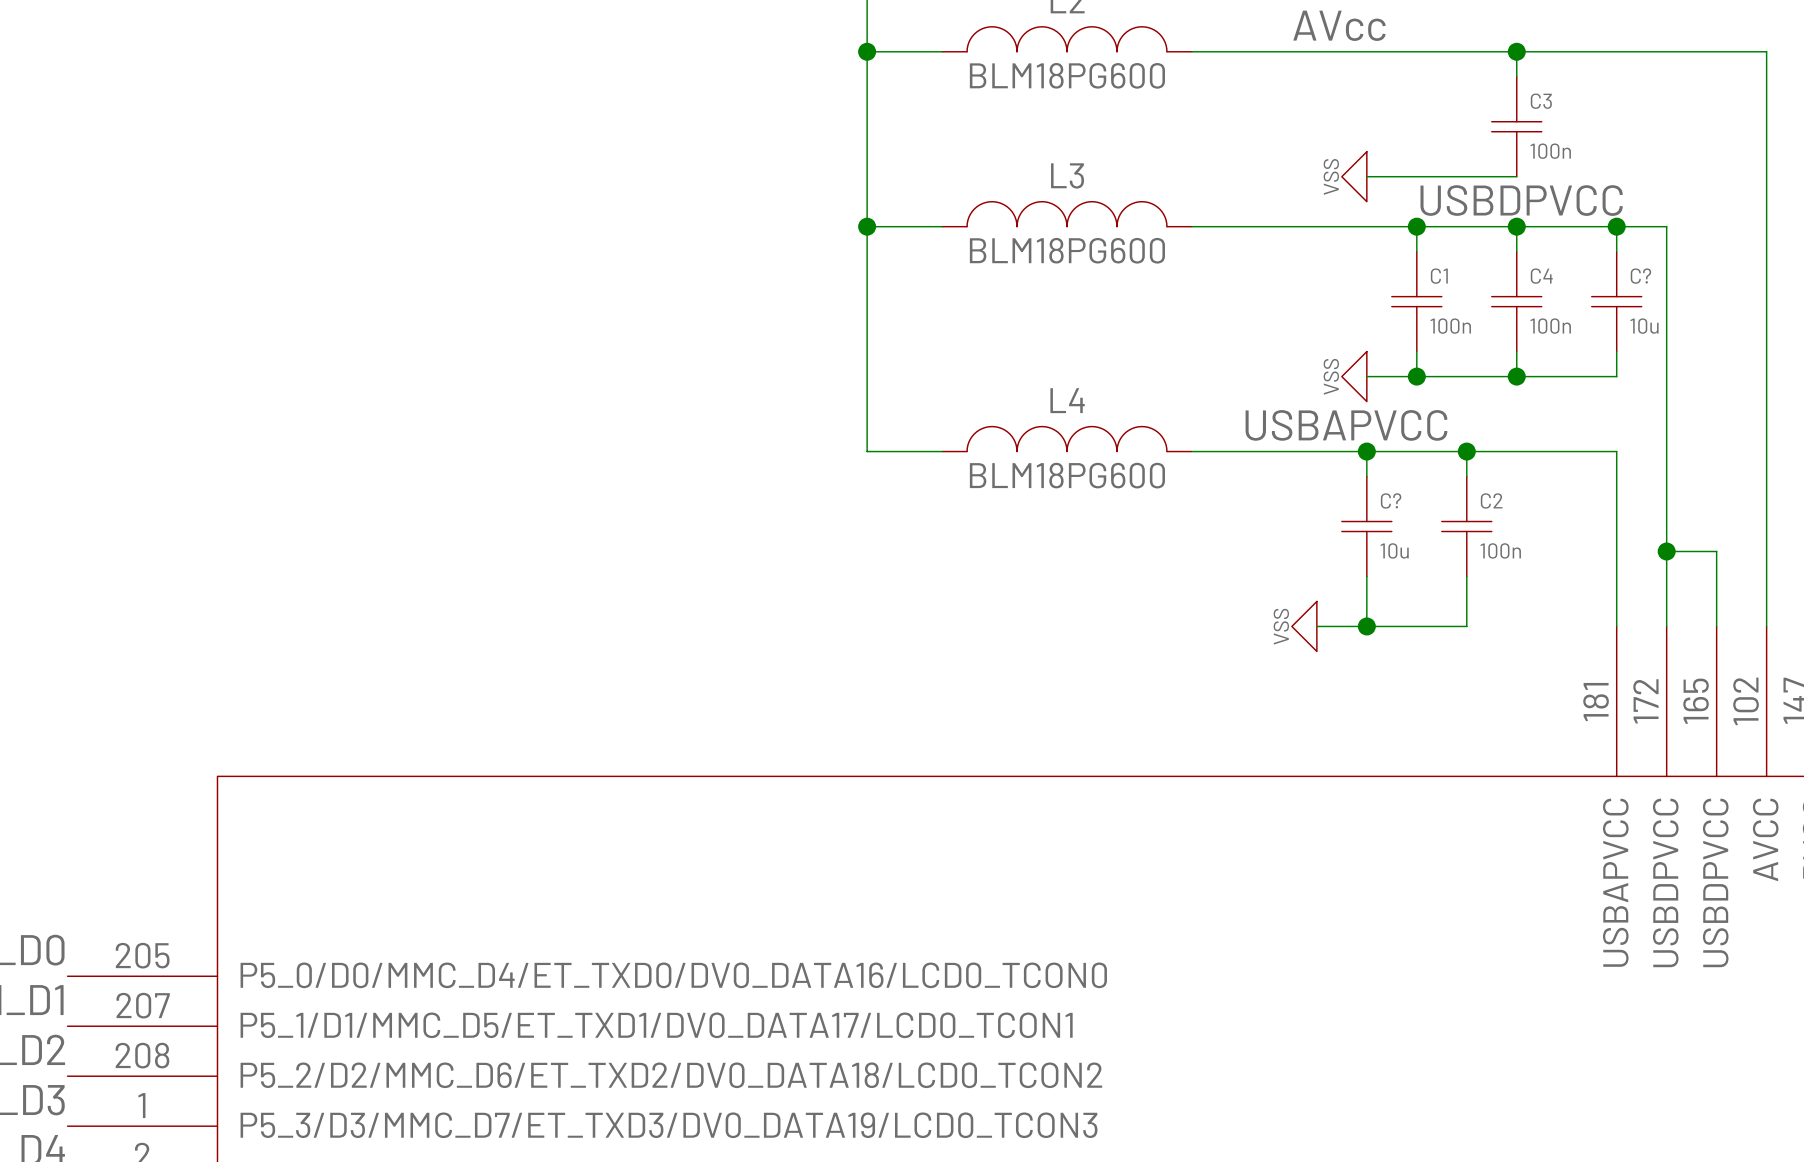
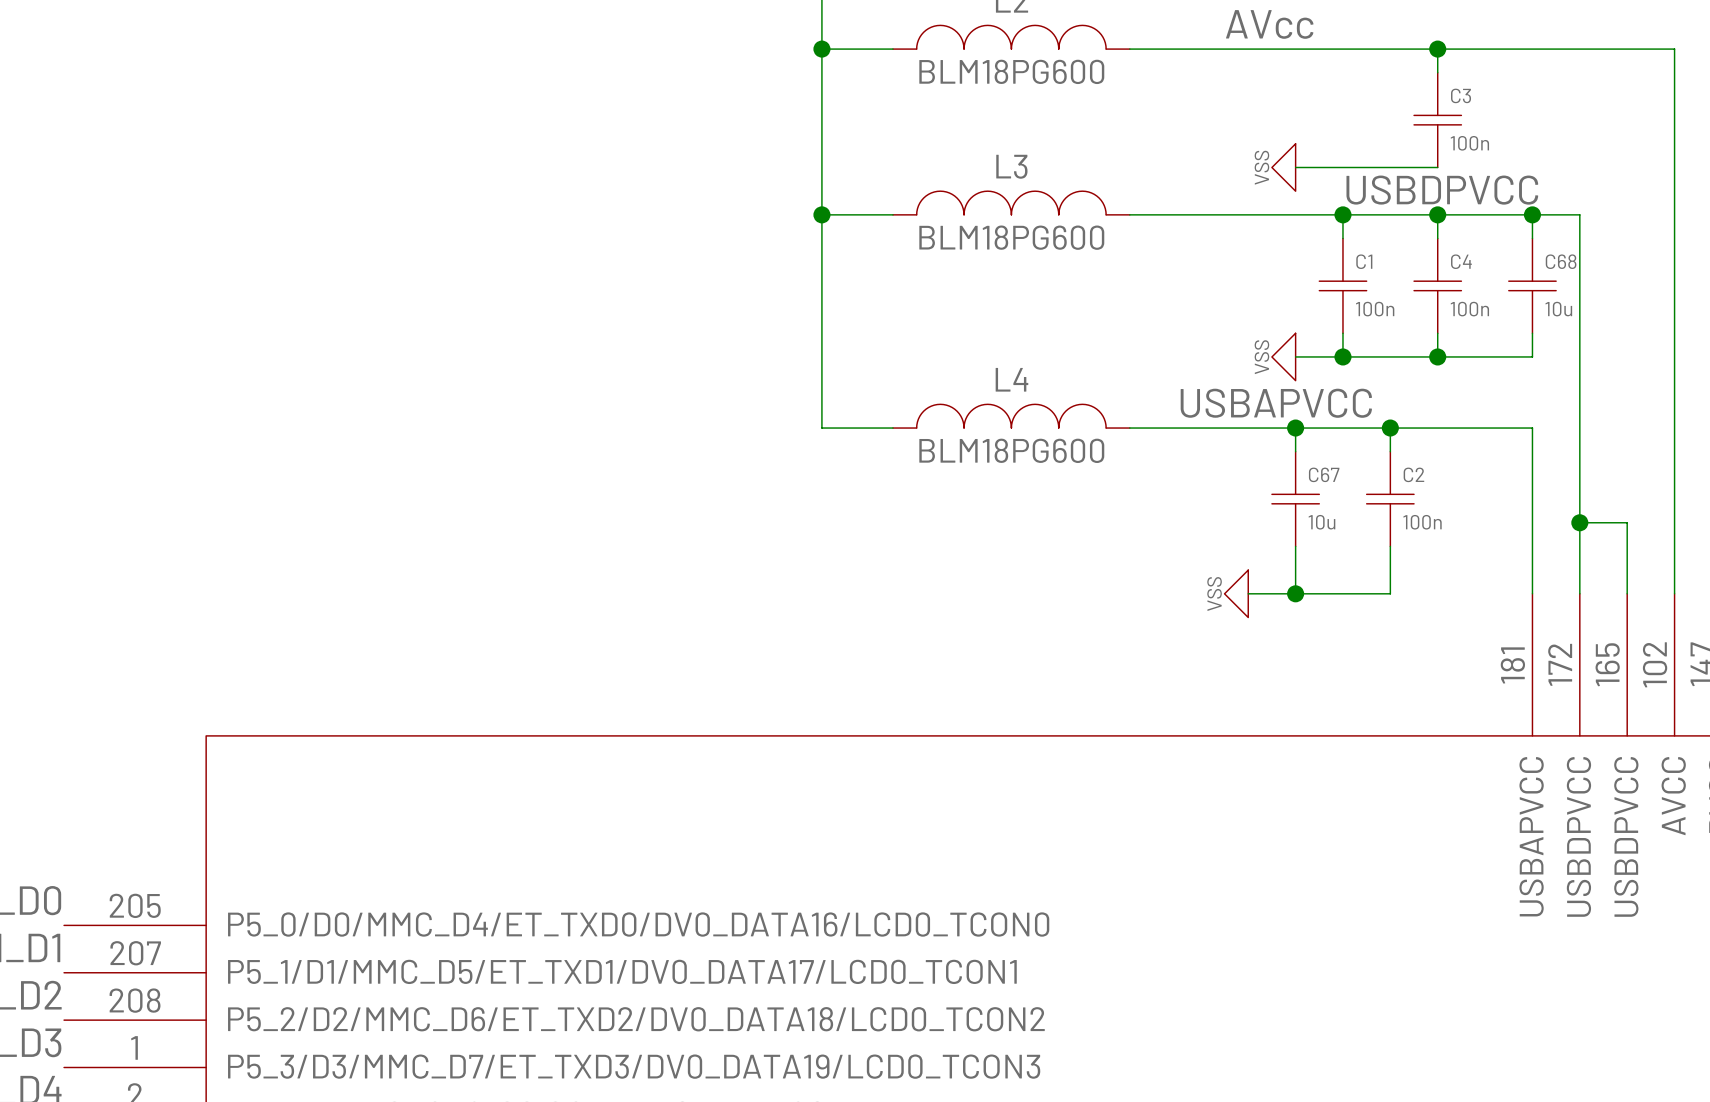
C? name: C? (1640, 276) -> C68 (1561, 261)
C? name: C? (1391, 500) -> C67 (1324, 474)

